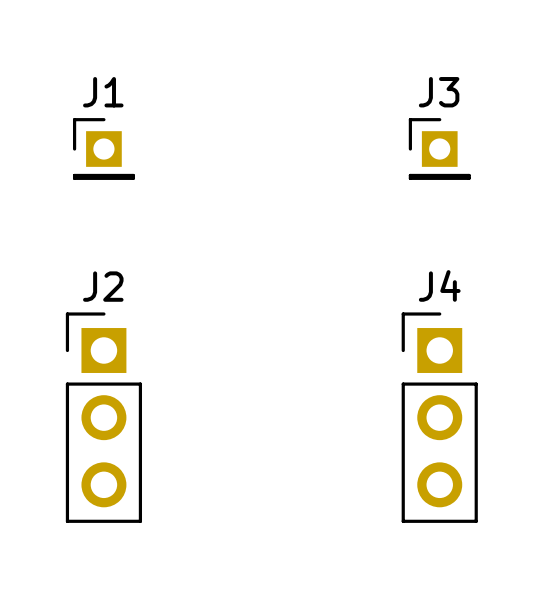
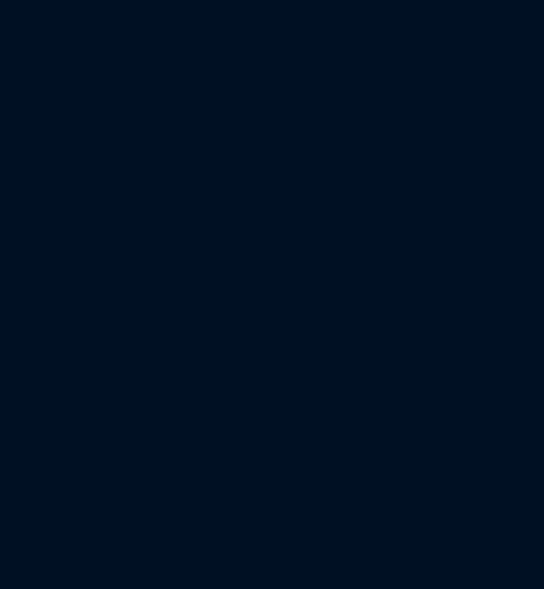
J1: (103, 149) -> none
J3: (439, 149) -> none
J2: (103, 417) -> none
J4: (439, 417) -> none

